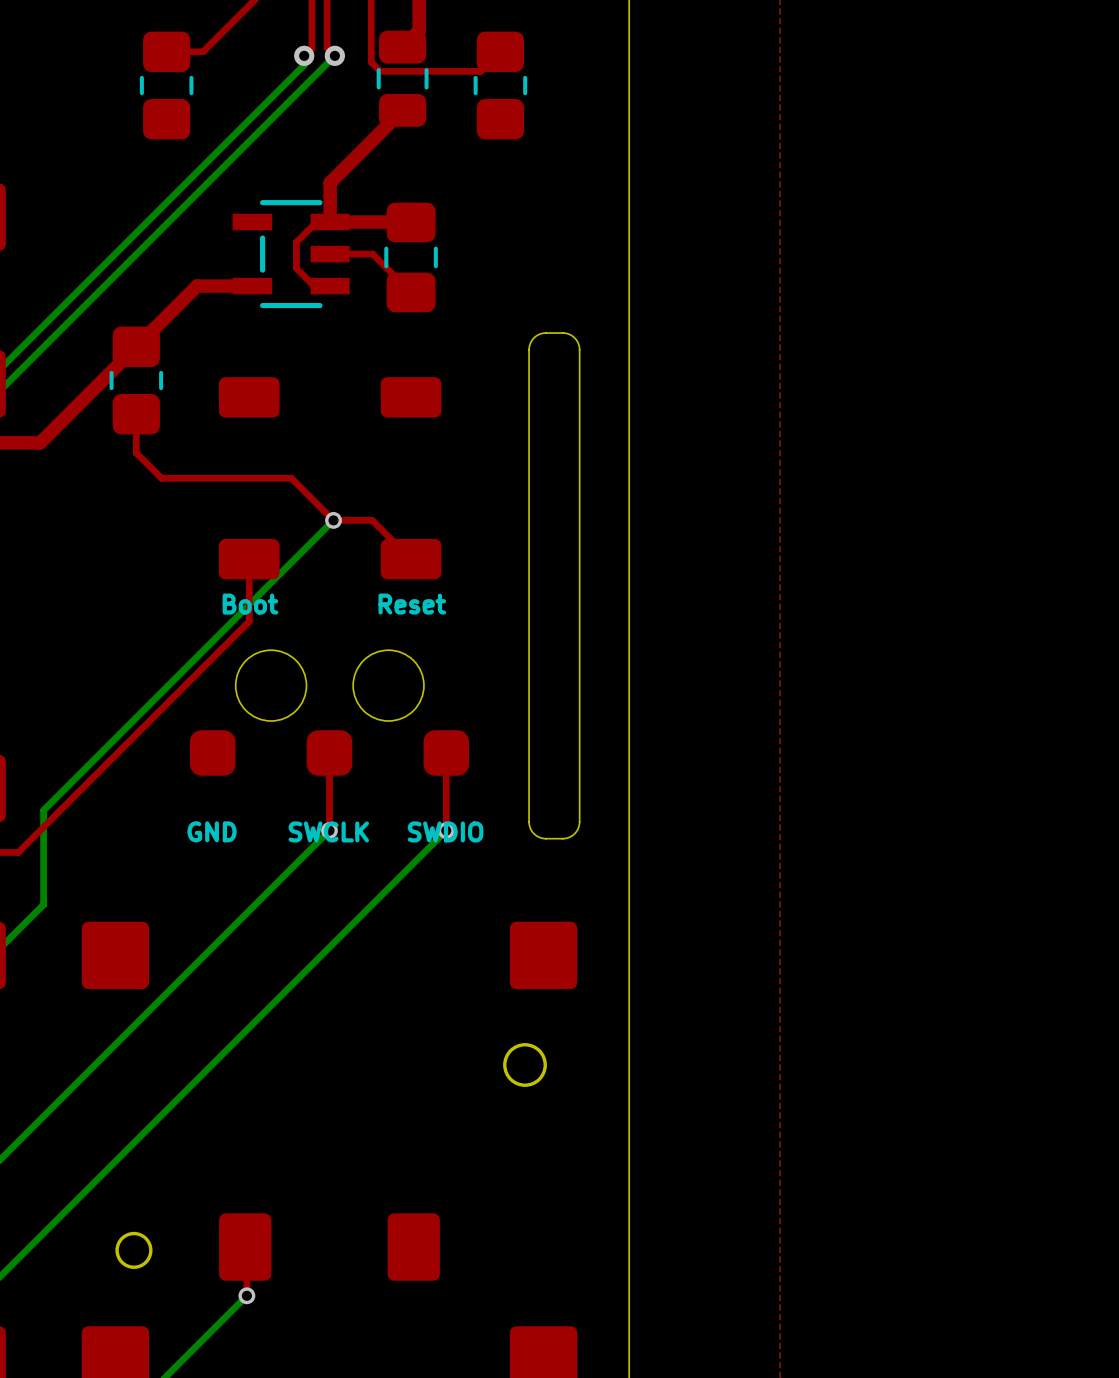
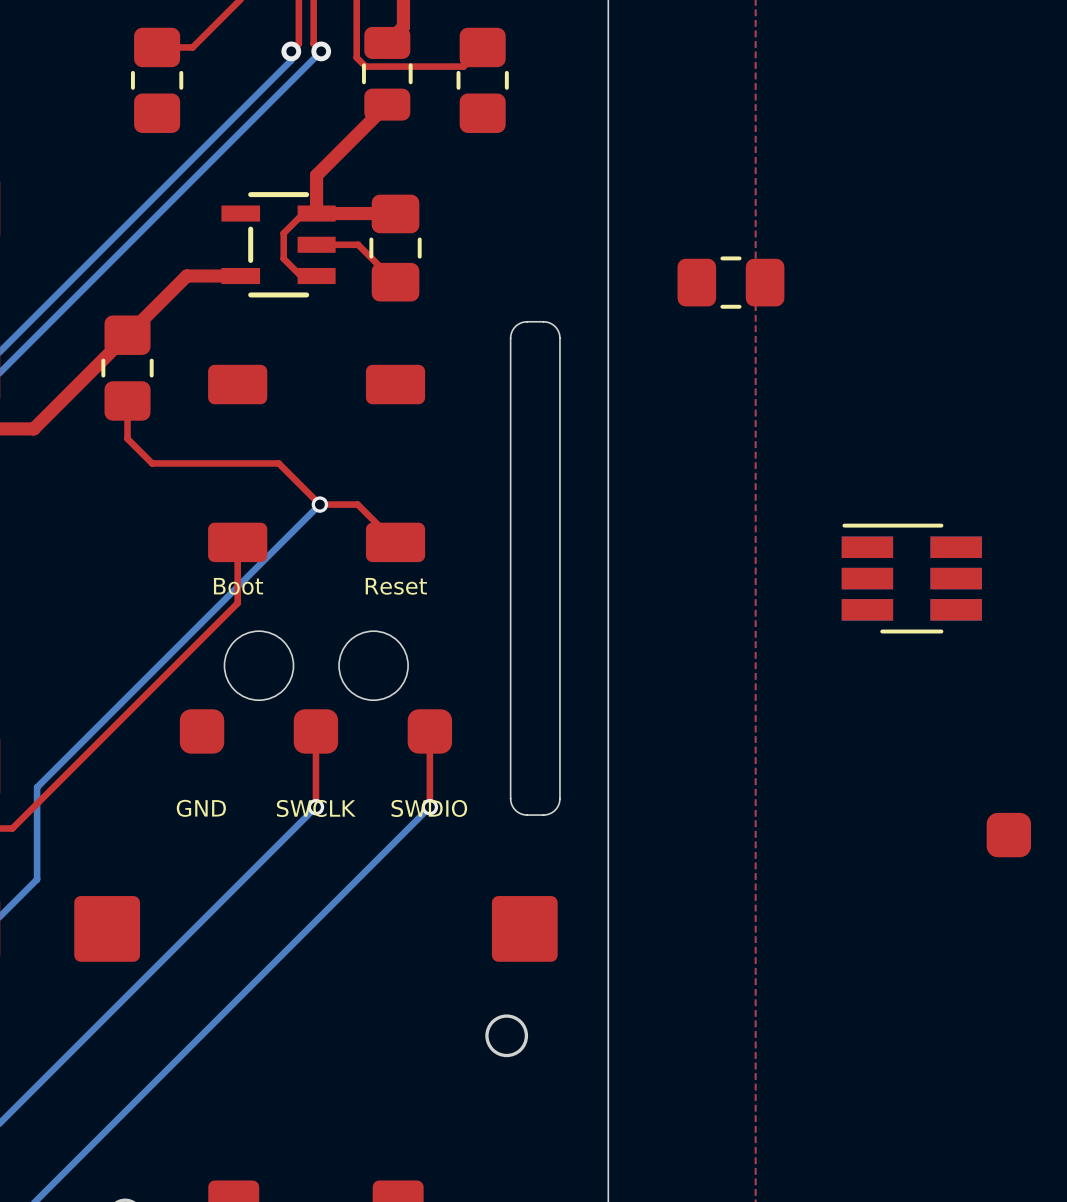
part: none -> (730, 282)
part: none -> (911, 578)
part: none -> (1008, 835)

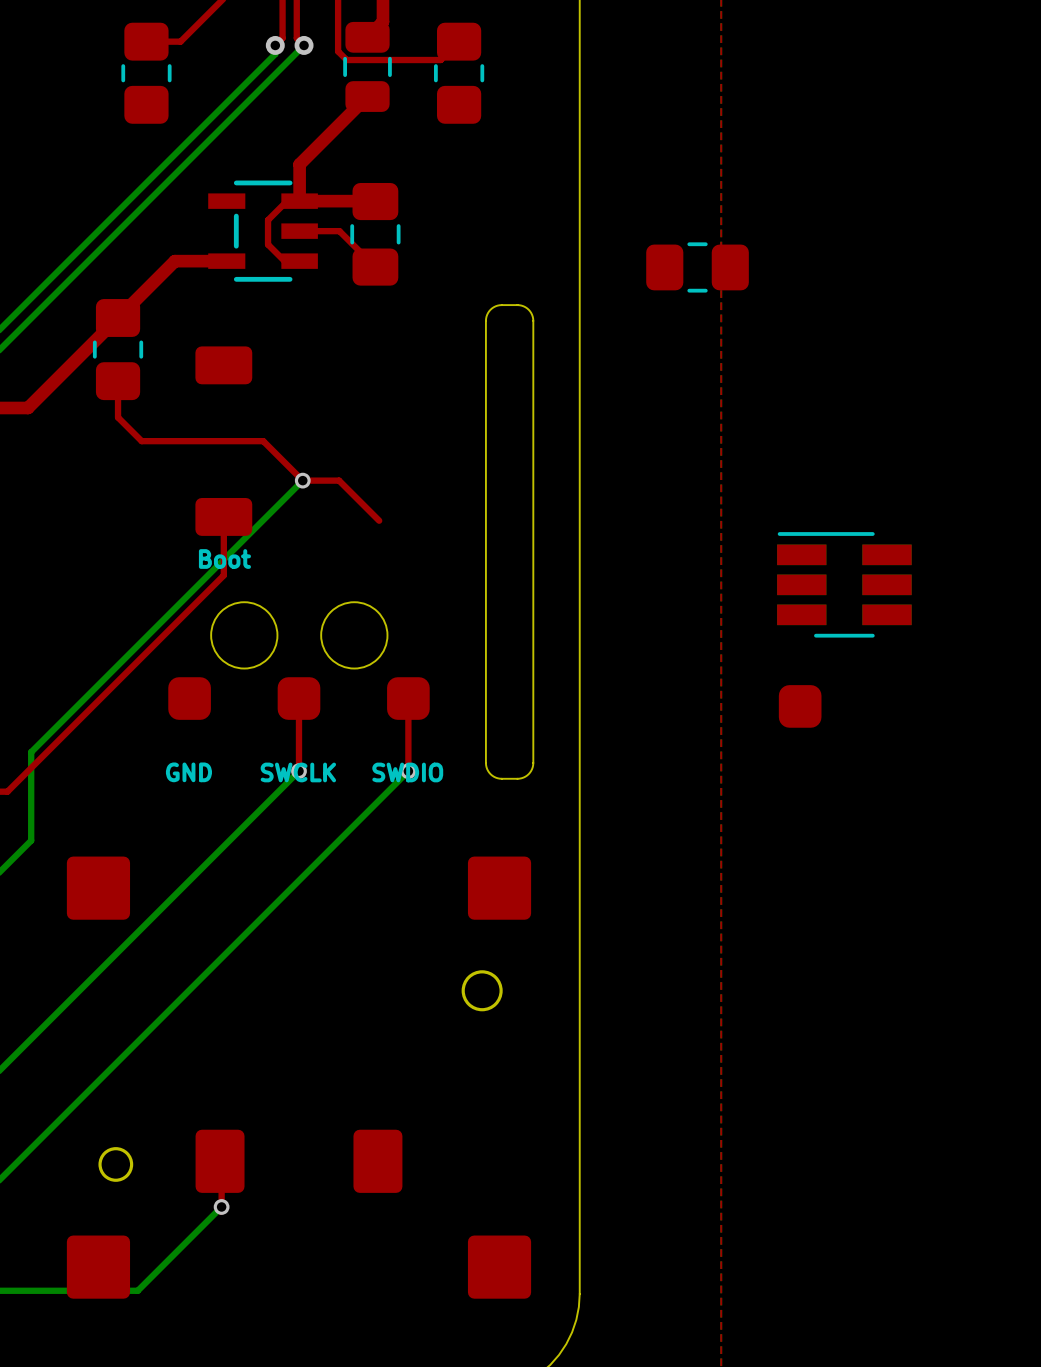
part: Reset (395, 463) -> none
part position: (911, 578) -> (844, 584)
part position: (1008, 835) -> (800, 706)

